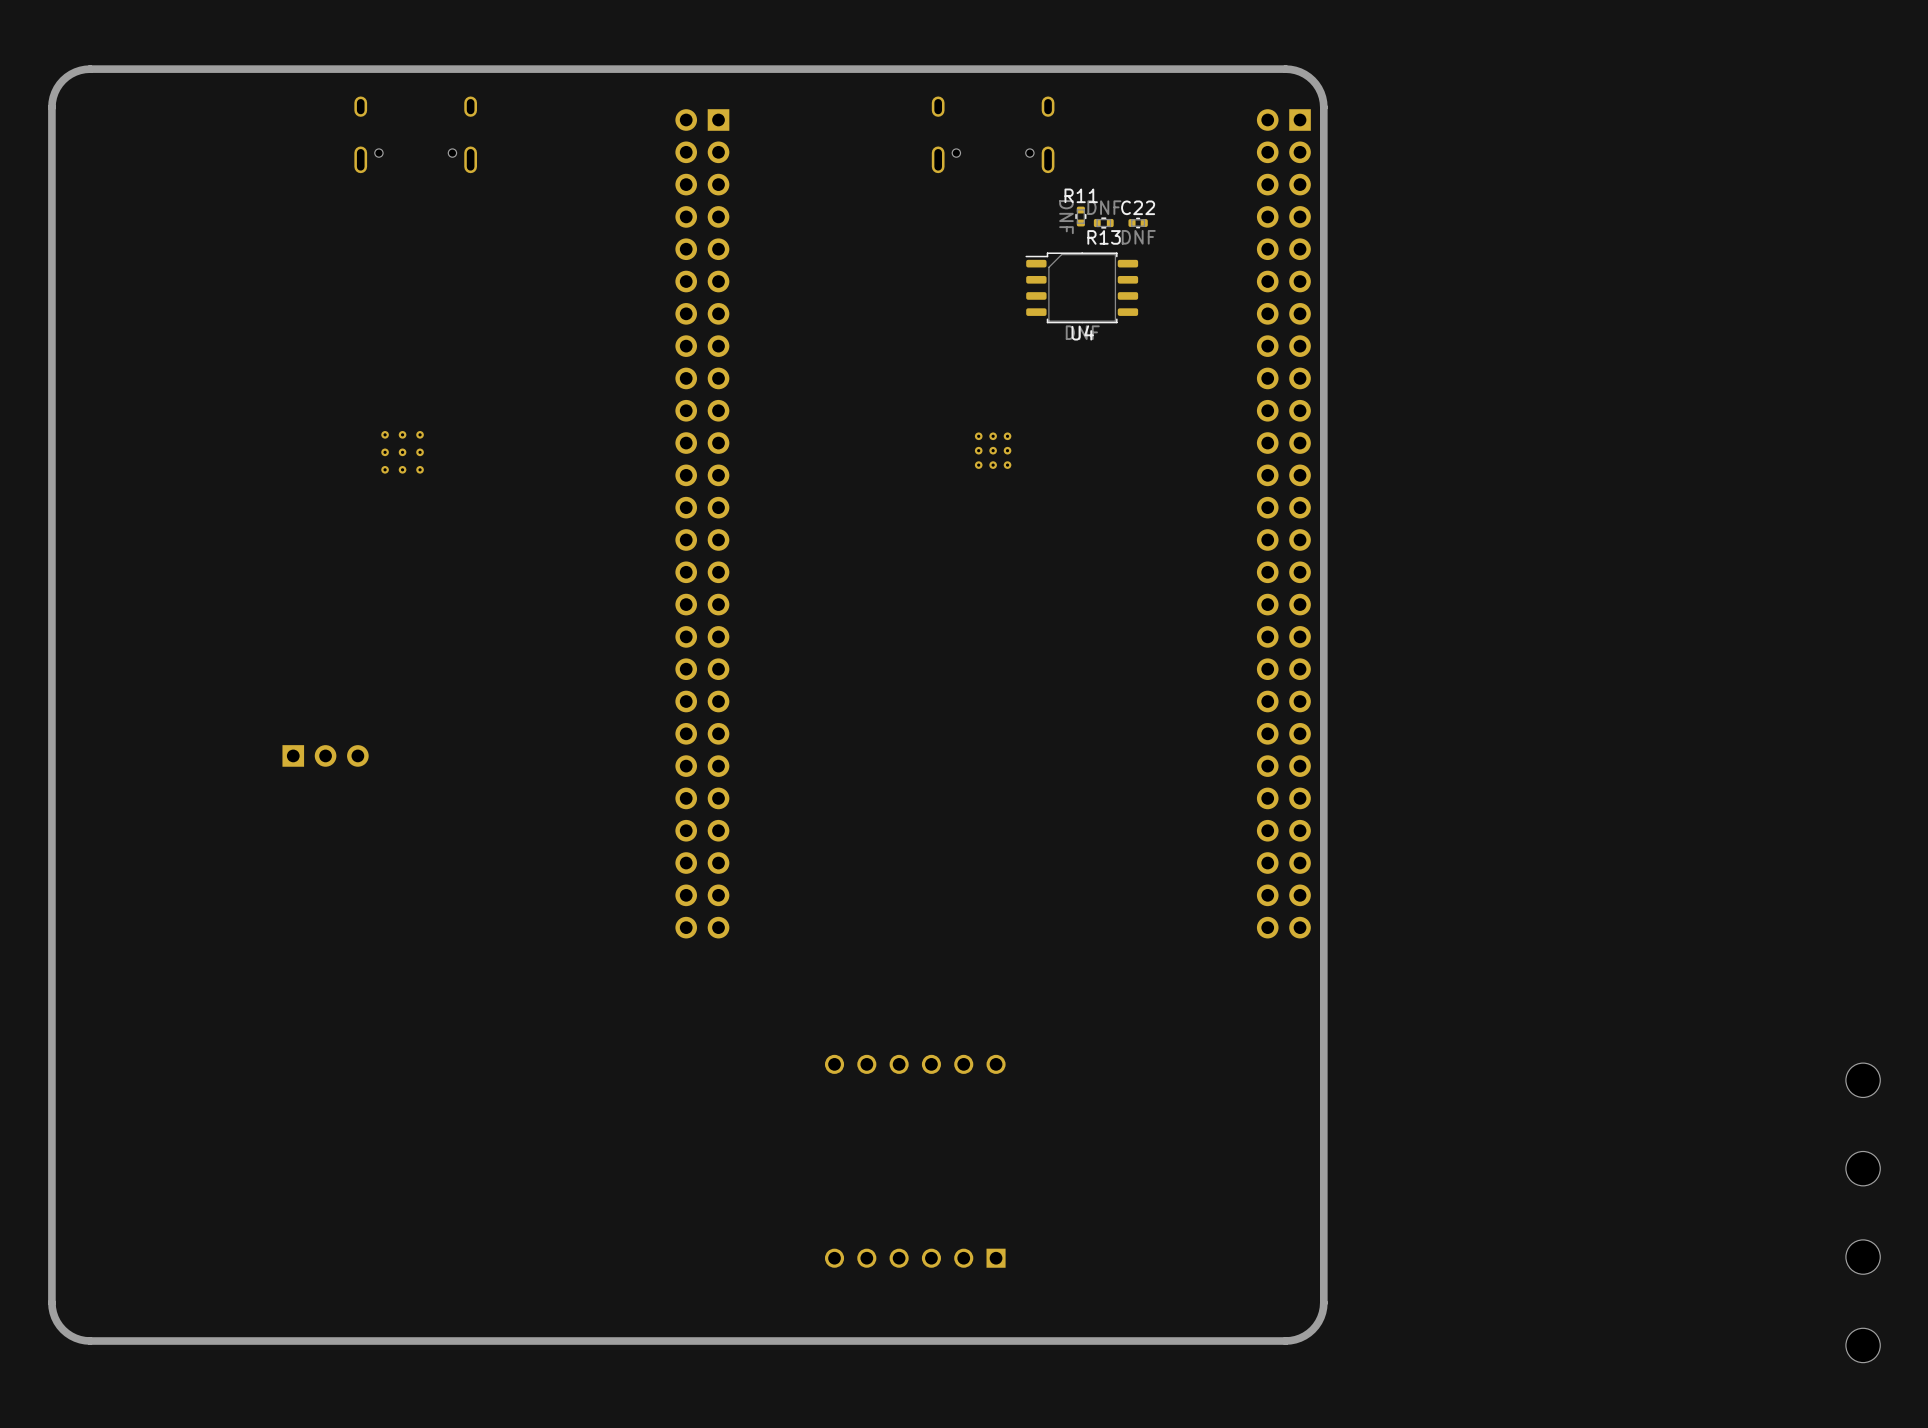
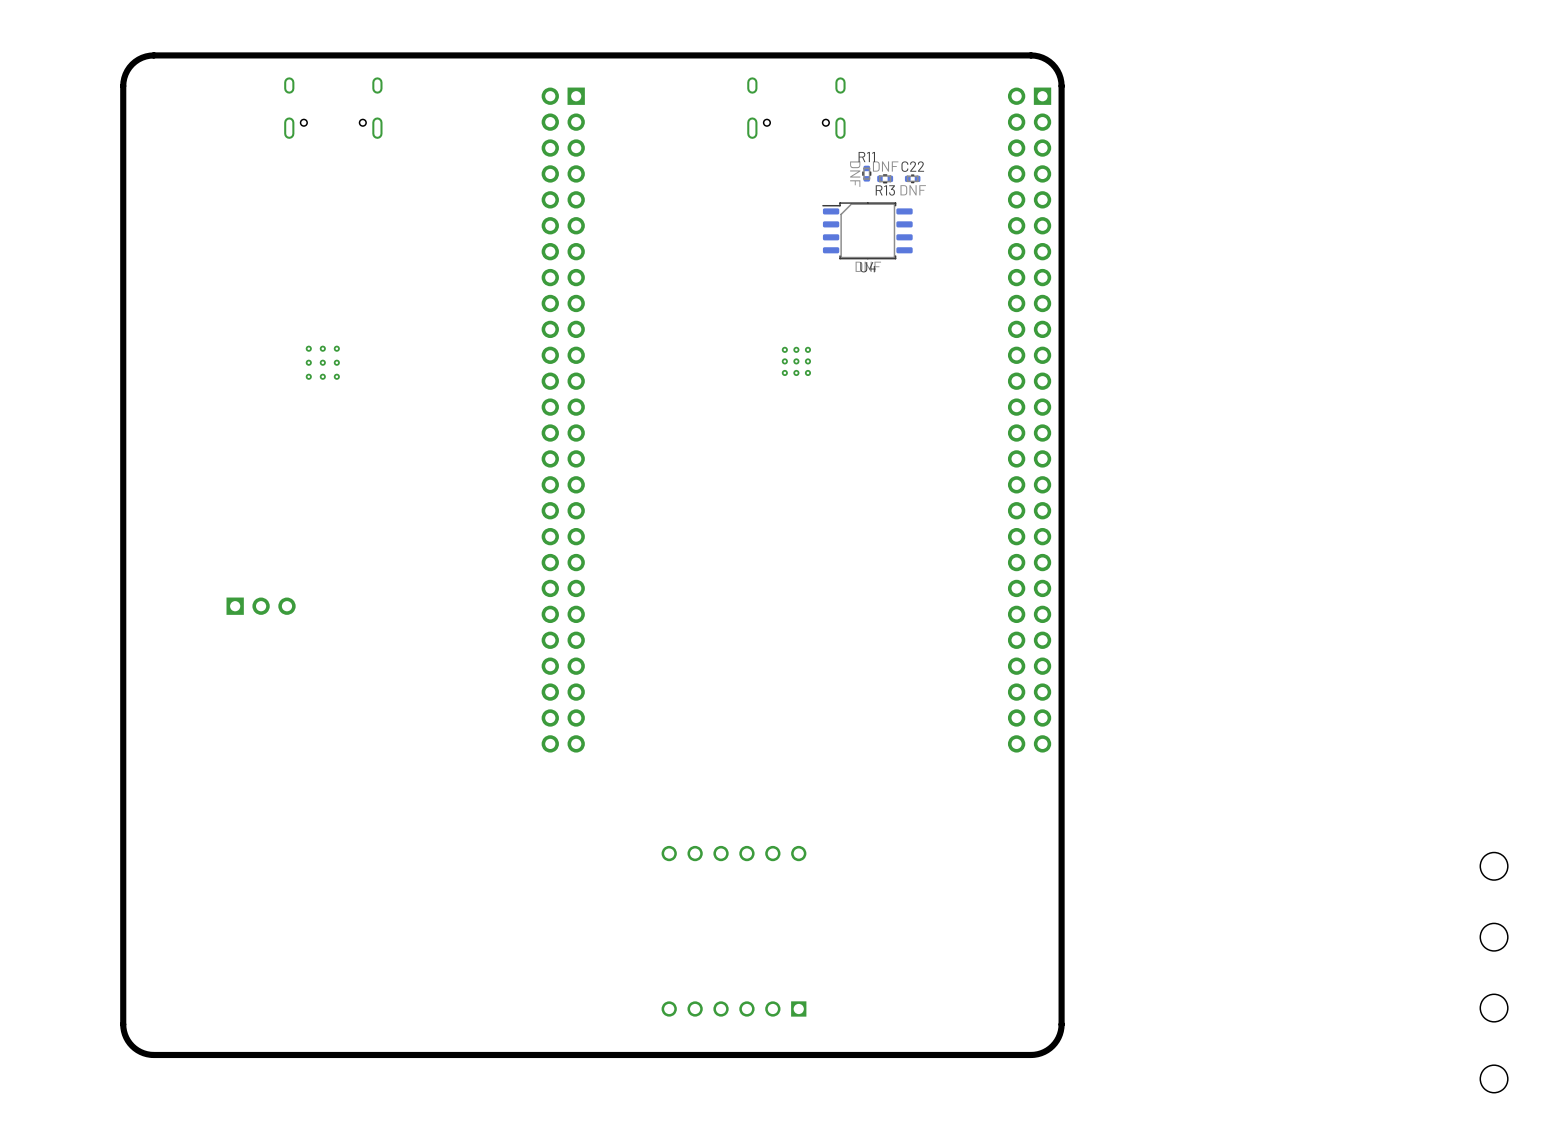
board edge: (191, 69) (80, 70) (66, 77) (59, 84) (52, 102) (51, 1302) (54, 1317) (63, 1329) (75, 1338) (90, 1341) (1285, 1341) (1304, 1335) (1318, 1321) (1323, 1307) (1323, 1277) -> (153, 55) (142, 57) (132, 64) (125, 74) (123, 86) (123, 1024) (124, 1034) (132, 1046) (140, 1051) (153, 1054) (1030, 1054) (1044, 1051) (1052, 1046) (1058, 1037) (1061, 1024)

